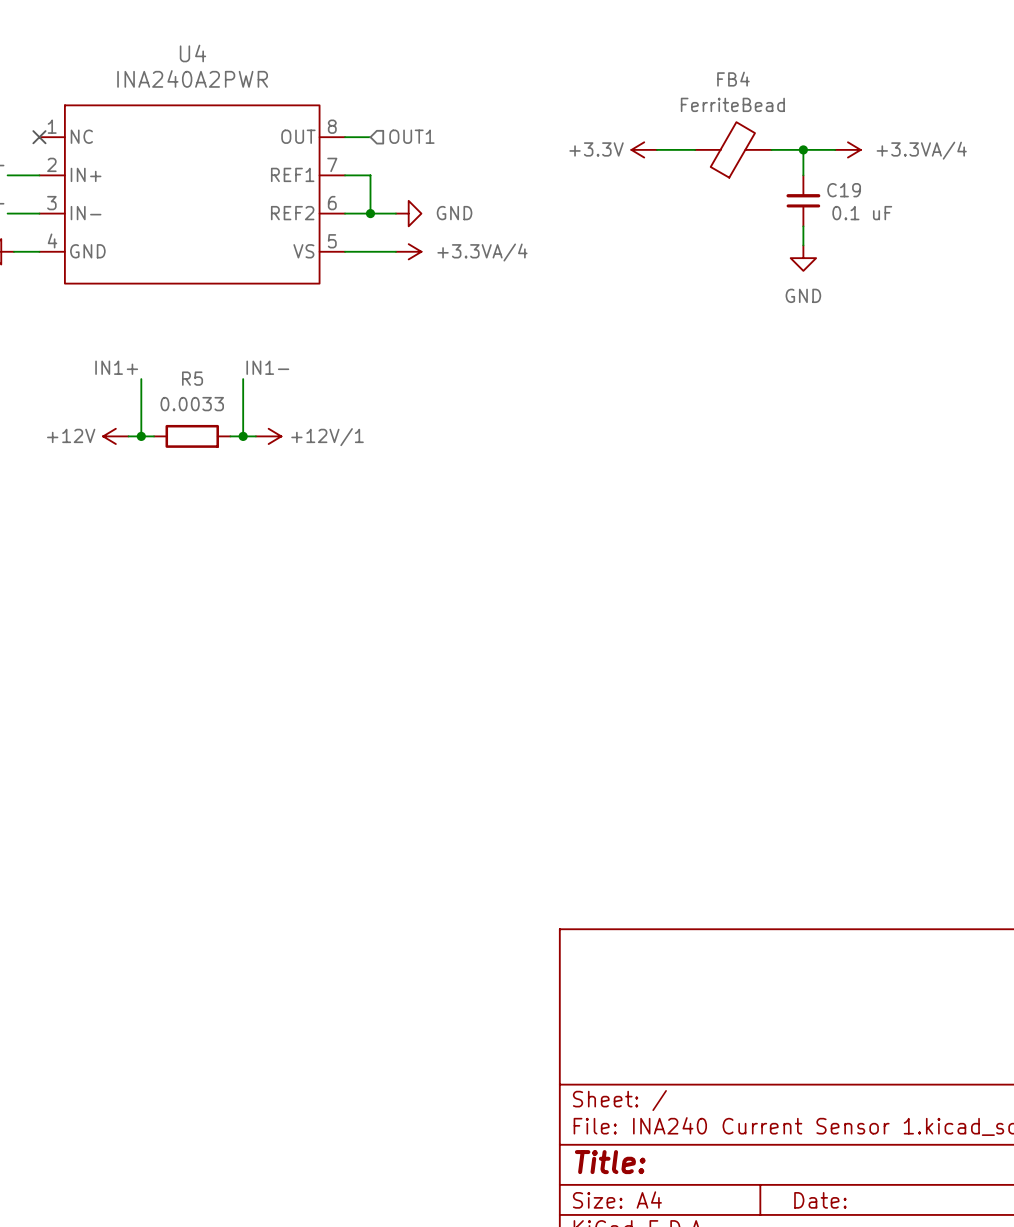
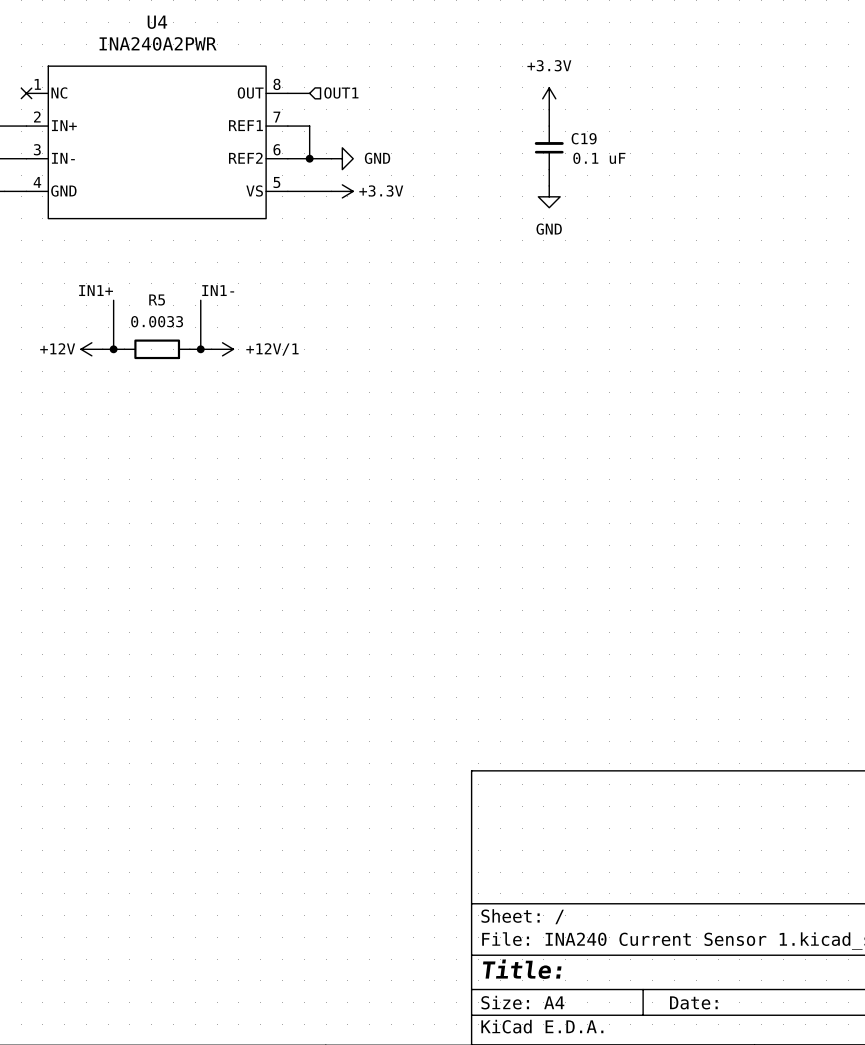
power symbol rotation: 0° (644, 149) -> 90° clockwise (549, 98)
wire: (656, 149) (695, 149) -> none
FB4: FerriteBead (733, 149) -> none
wire: (771, 149) (835, 149) -> none
wire: (803, 149) (803, 175) -> none
junction: (803, 149) -> none
power symbol: +3.3VA/4 (847, 149) -> none
wire: none -> (549, 109) (549, 126)
C19 position: (803, 200) -> (549, 147)
wire: (803, 226) (803, 245) -> (549, 169) (549, 185)
power symbol: +3.3VA/4 (408, 251) -> +3.3V (342, 191)
power symbol position: GND (803, 258) -> GND (549, 196)

